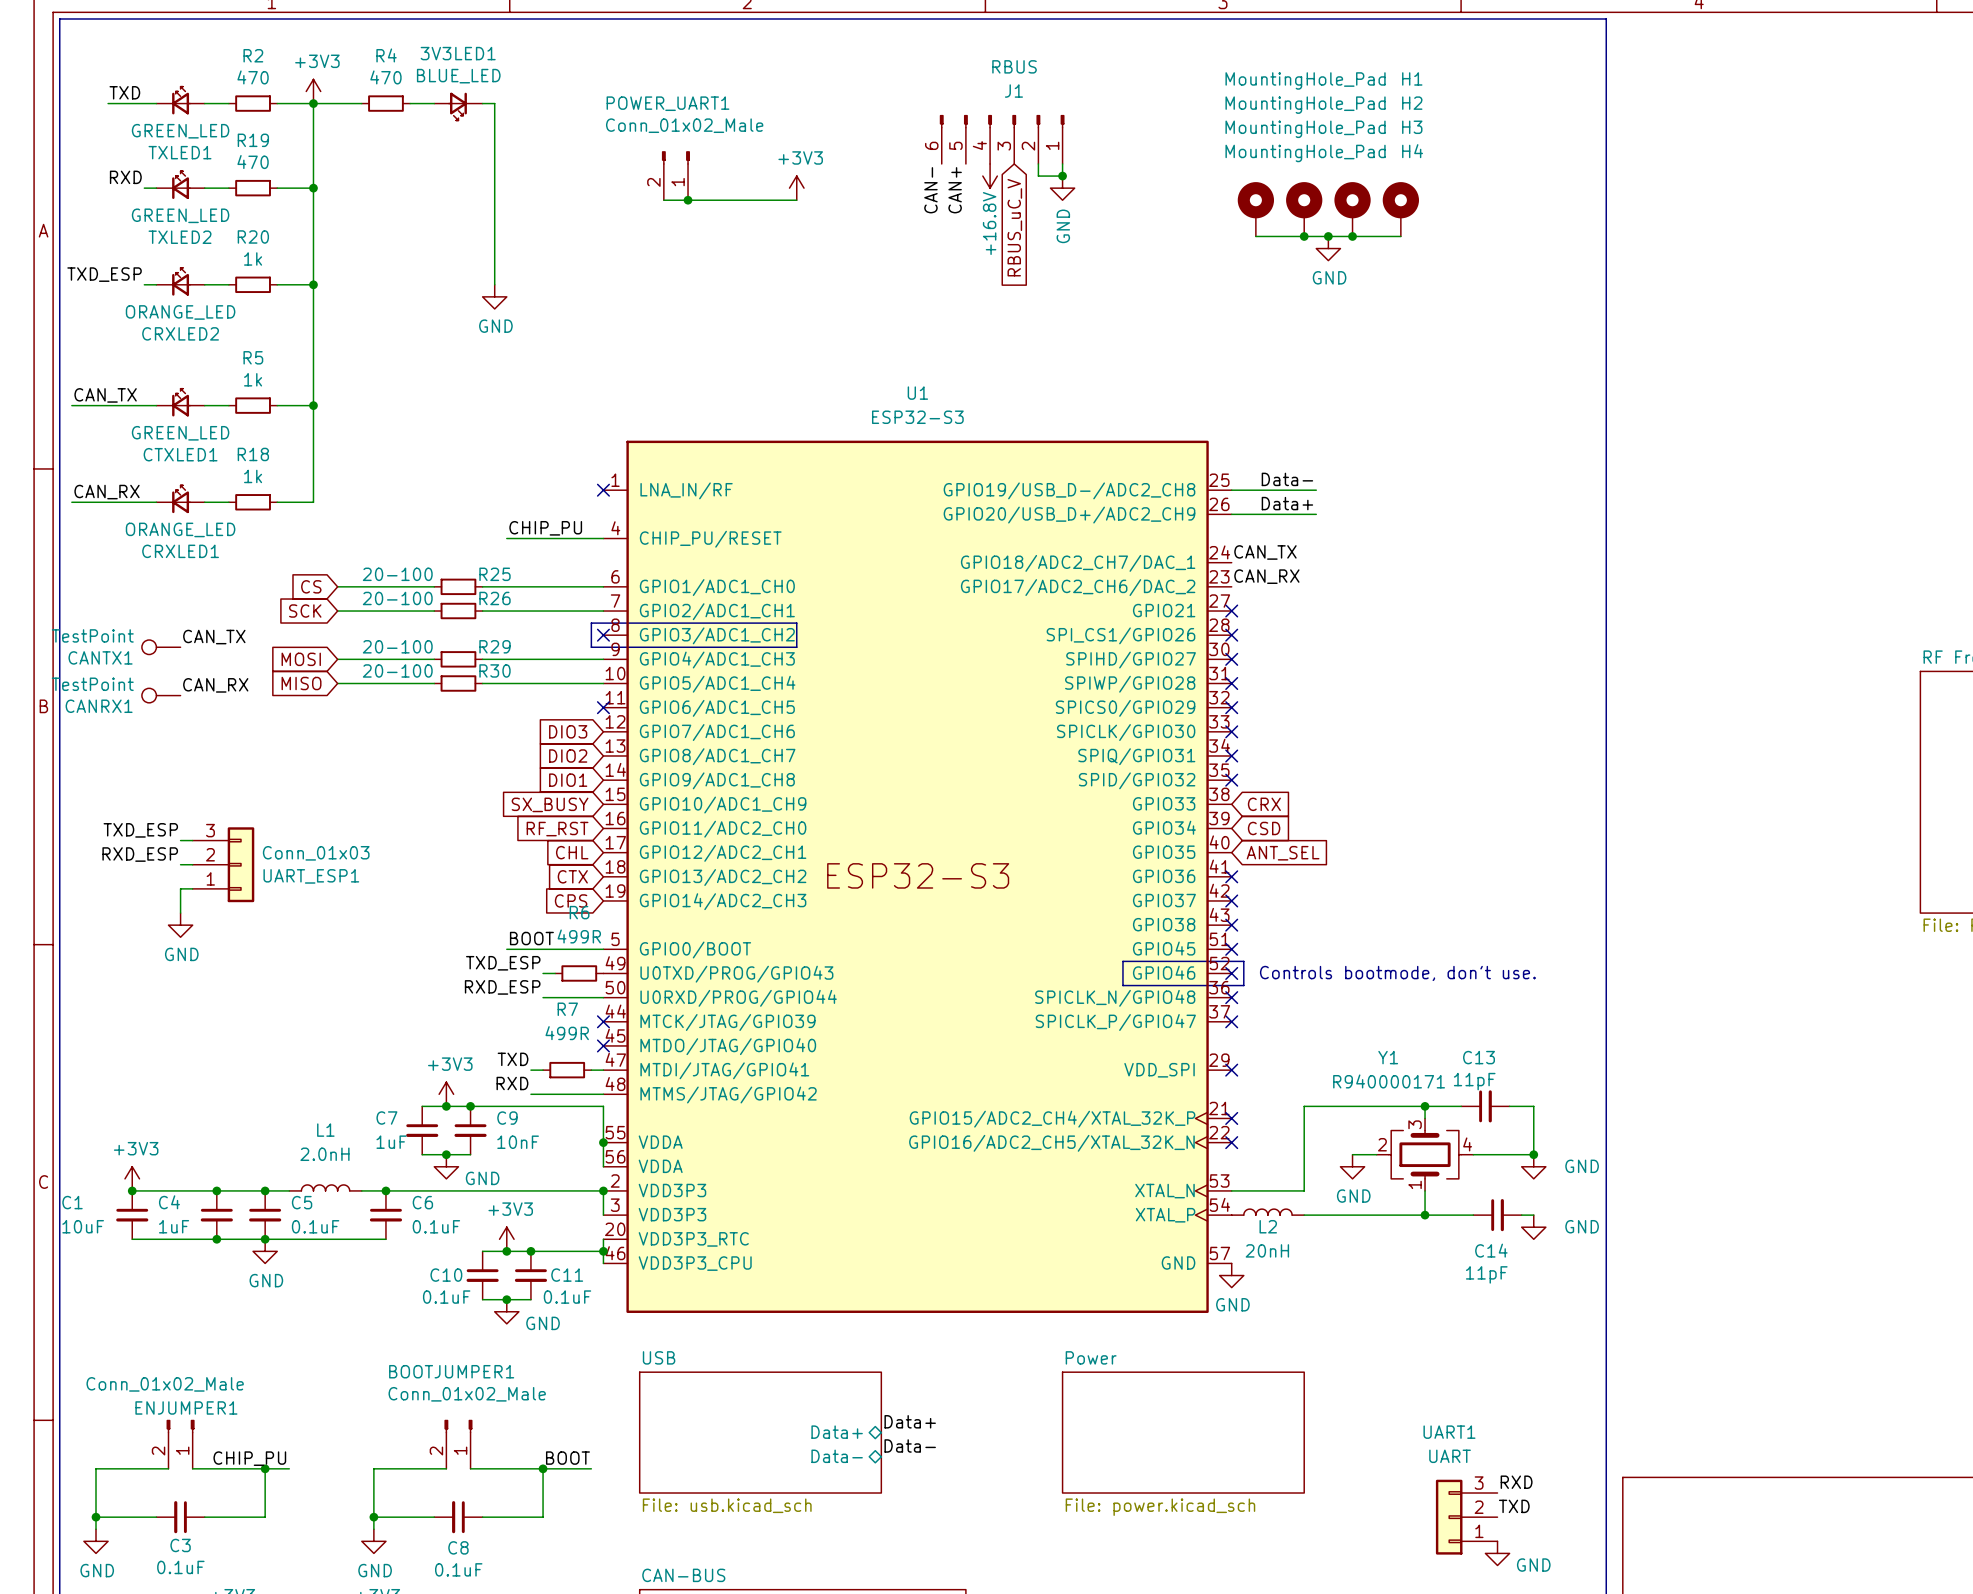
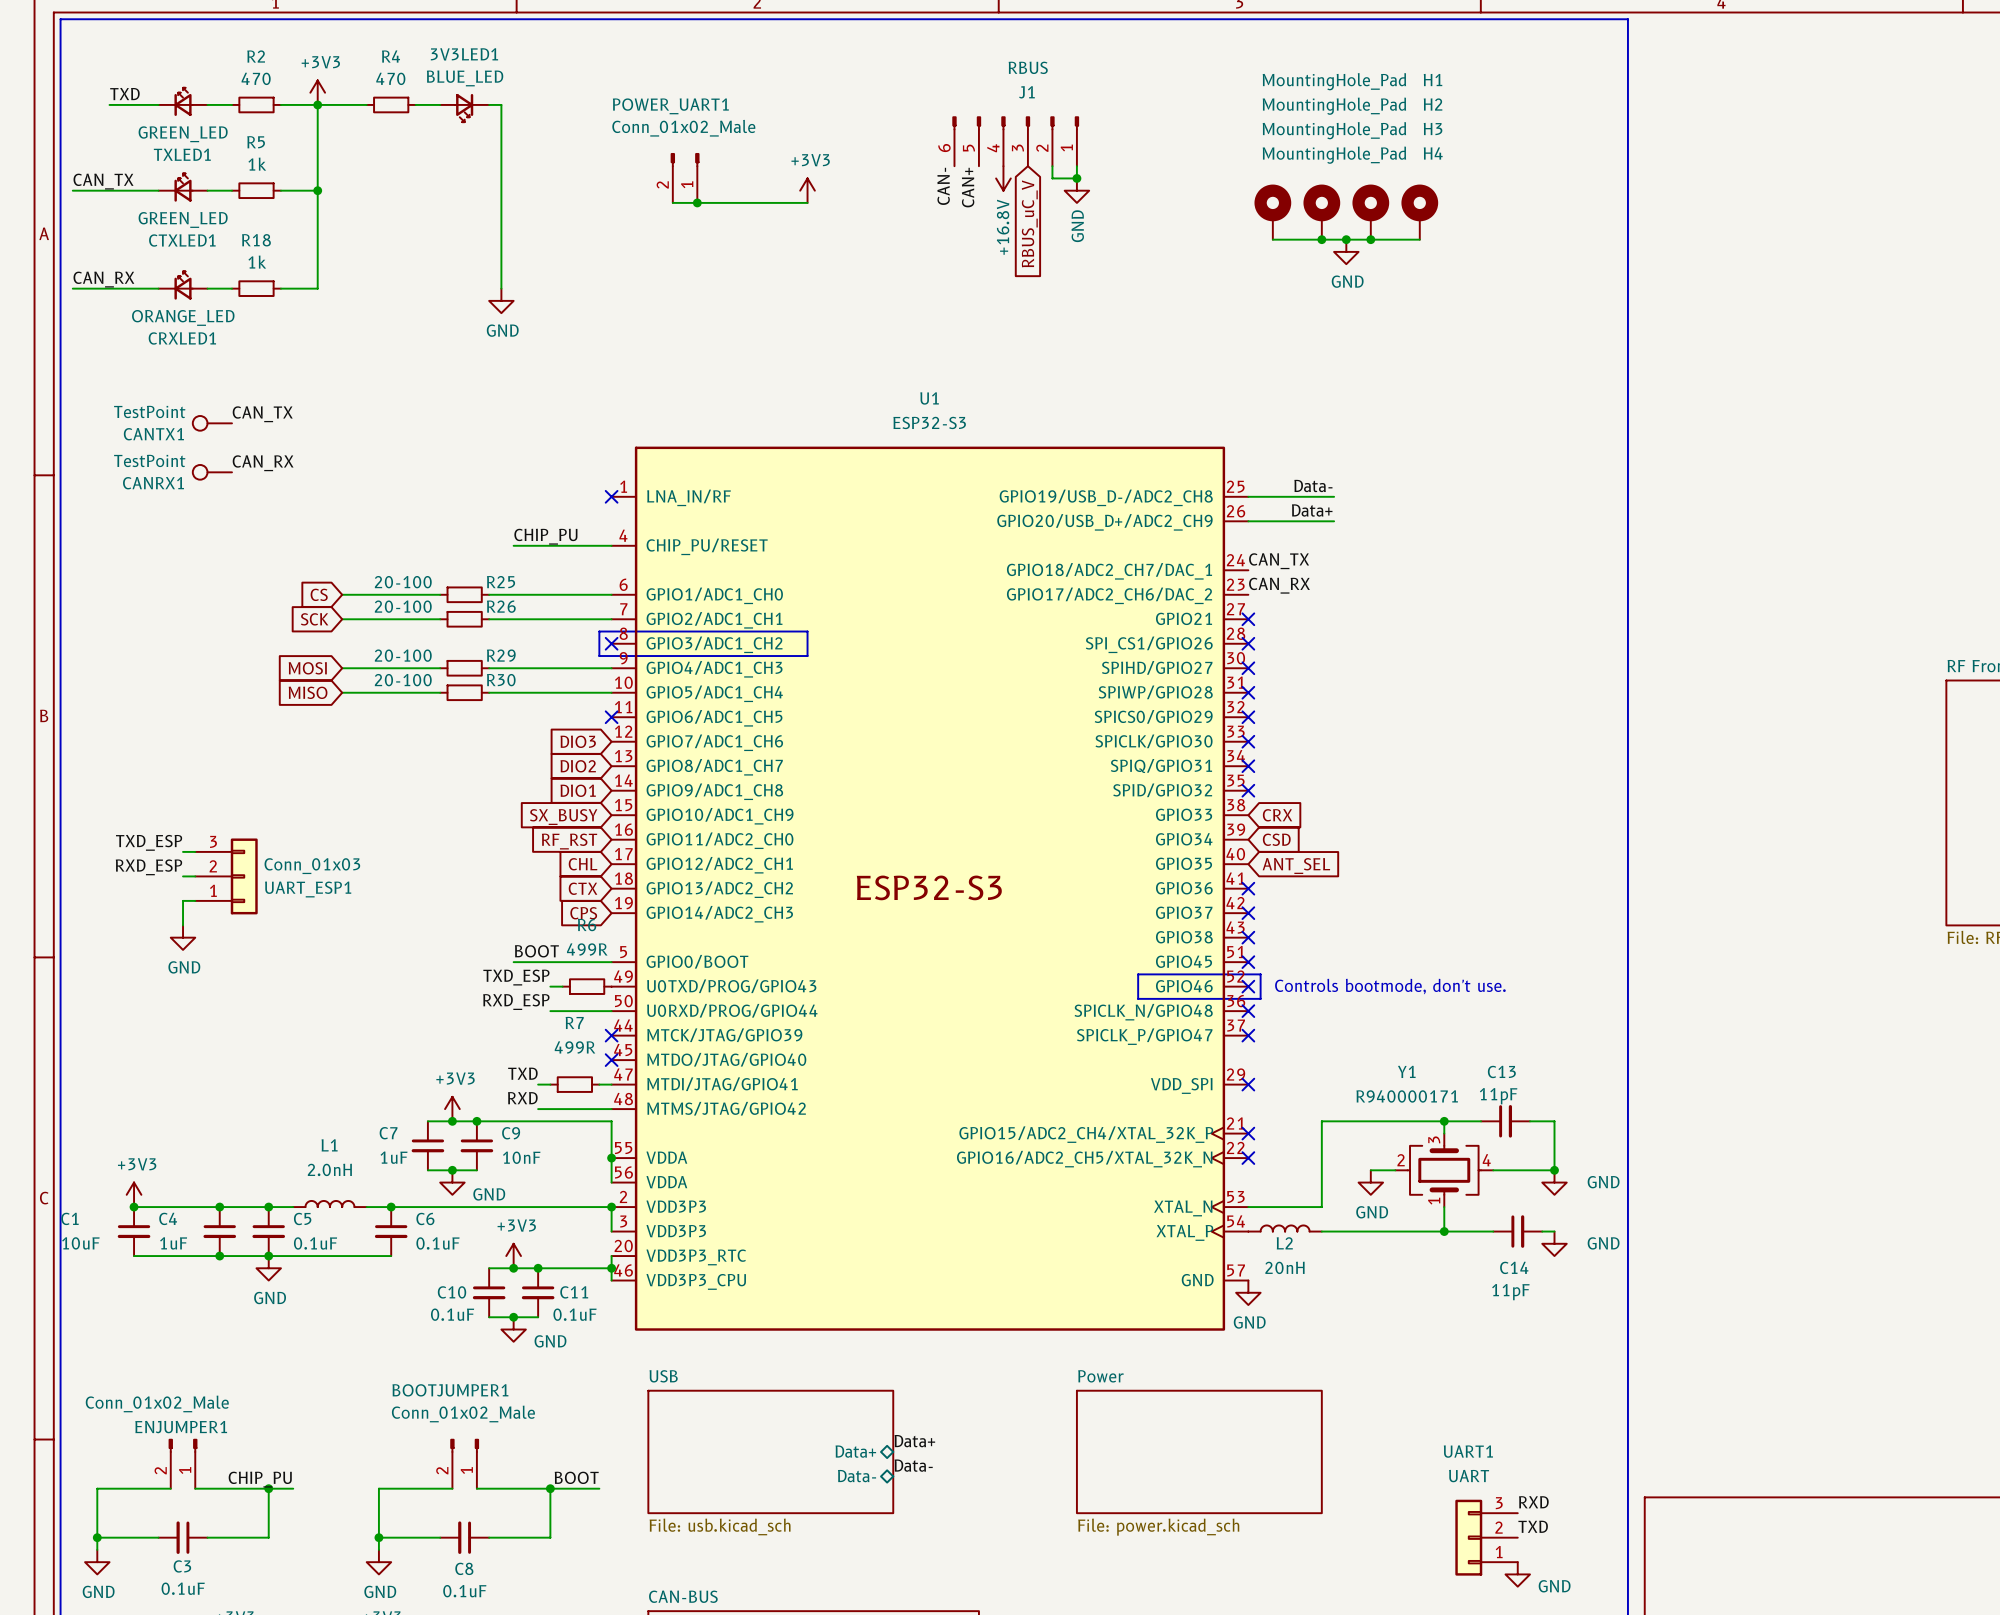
R19 name: R19 (253, 140) -> R5 (256, 142)
R19 value: 470 (253, 162) -> 1k (257, 164)
label: none -> CAN_TX (103, 181)
label: RXD (125, 177) -> none
wire: none -> (72, 190) (146, 190)
R20 name: R20 (253, 236) -> R18 (256, 240)
TXLED2 name: TXLED2 (180, 237) -> CTXLED1 (182, 240)
label: TXD_ESP (104, 274) -> none
label: none -> CAN_RX (103, 279)
wire: none -> (72, 288) (146, 288)
wire: (313, 284) (313, 502) (277, 502) -> none
junction: (313, 284) -> none
CRXLED2 name: CRXLED2 (180, 333) -> CRXLED1 (182, 338)
label: CAN_TX (105, 395) -> none
CTXLED1: GREEN_LED (180, 402) -> none
wire: (71, 405) (156, 405) -> none
wire: (204, 405) (228, 405) -> none
R5: 1k (253, 405) -> none
wire: (277, 405) (313, 405) -> none
junction: (313, 405) -> none
label: none -> CAN_TX (262, 414)
label: none -> CAN_RX (263, 463)
label: CAN_RX (107, 492) -> none
CRXLED1: ORANGE_LED (180, 499) -> none
wire: (71, 502) (156, 502) -> none
wire: (204, 502) (228, 502) -> none
R18: 1k (253, 502) -> none
label: CAN_TX (214, 637) -> none
CANTX1 position: (161, 647) -> (212, 423)
label: CAN_RX (215, 685) -> none
CANRX1 position: (161, 695) -> (212, 472)

